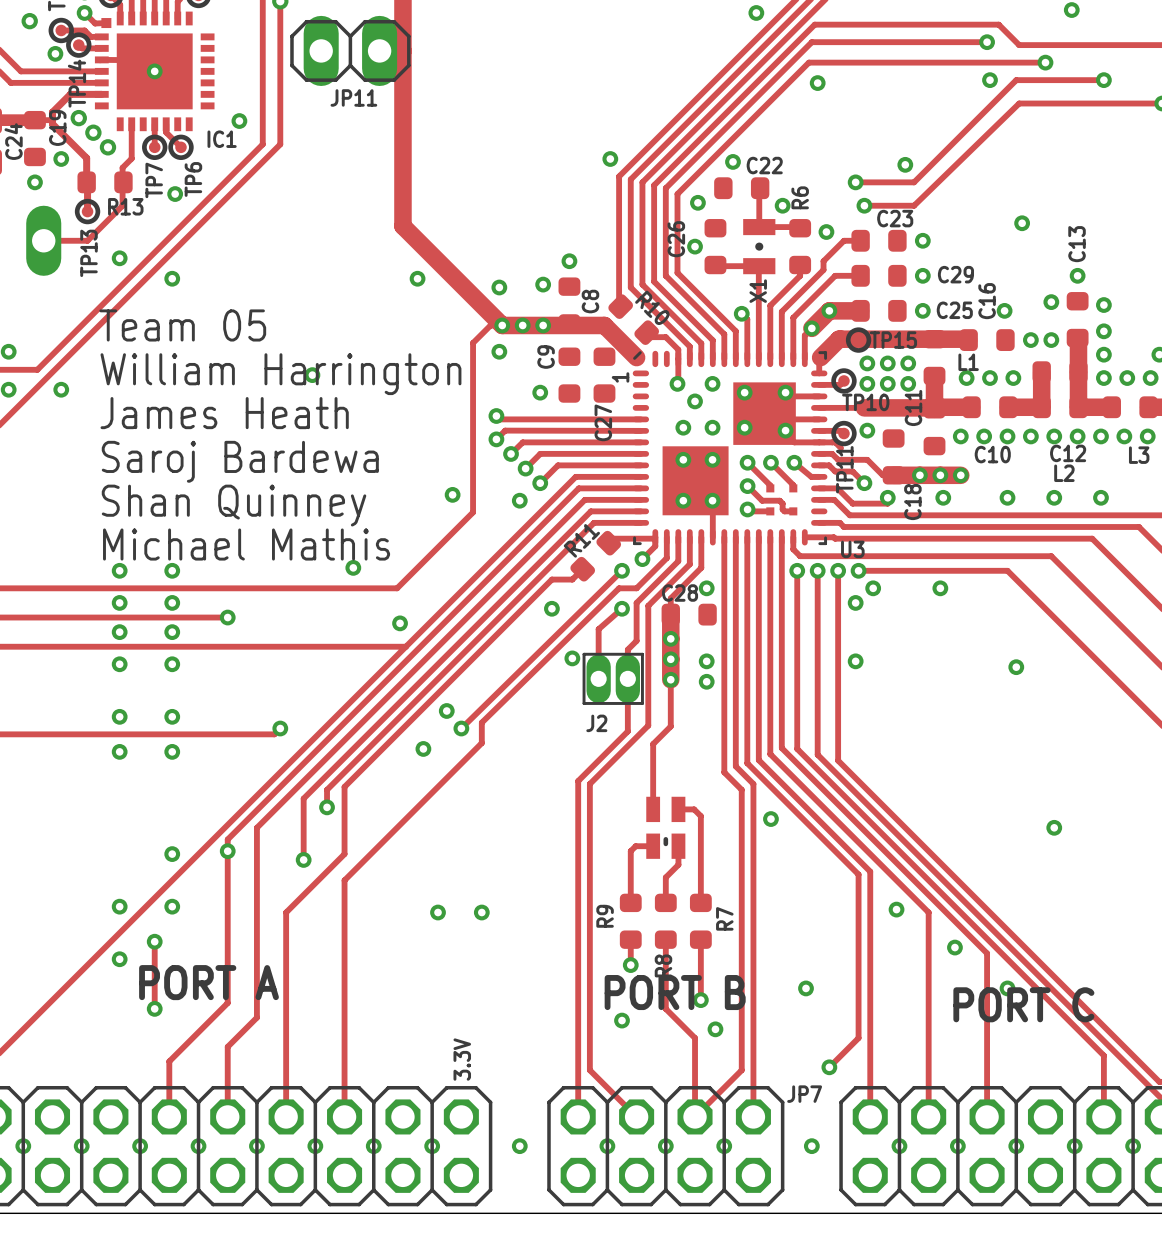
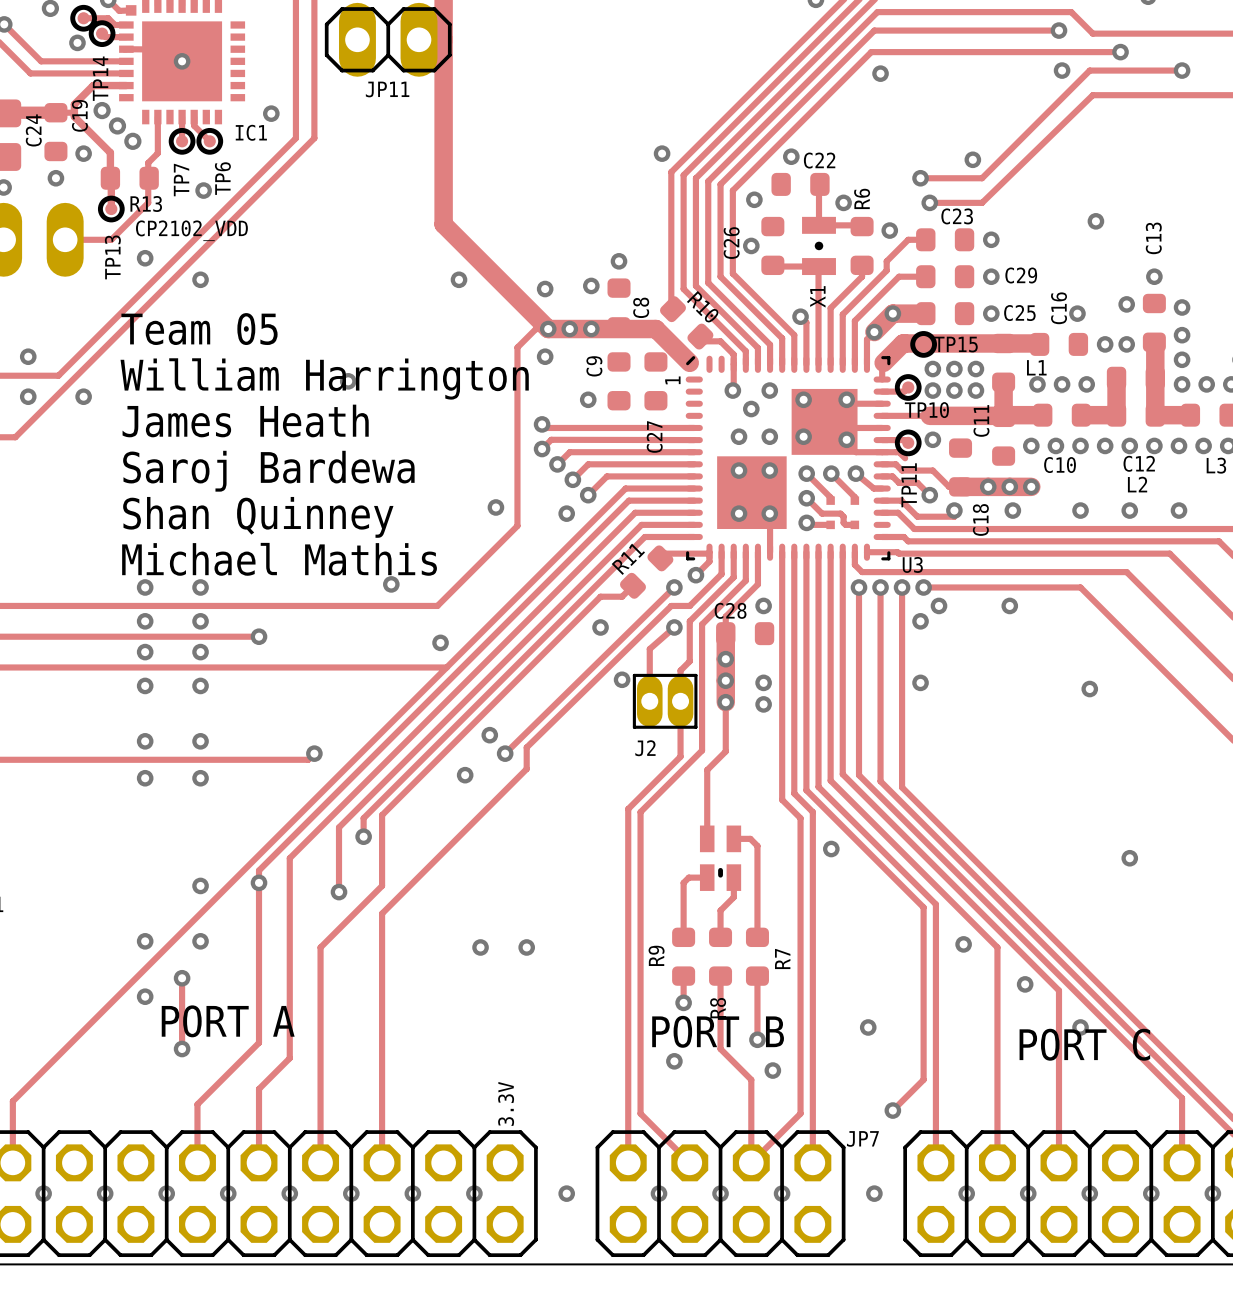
text: none -> CP2102_VDD (191, 230)

